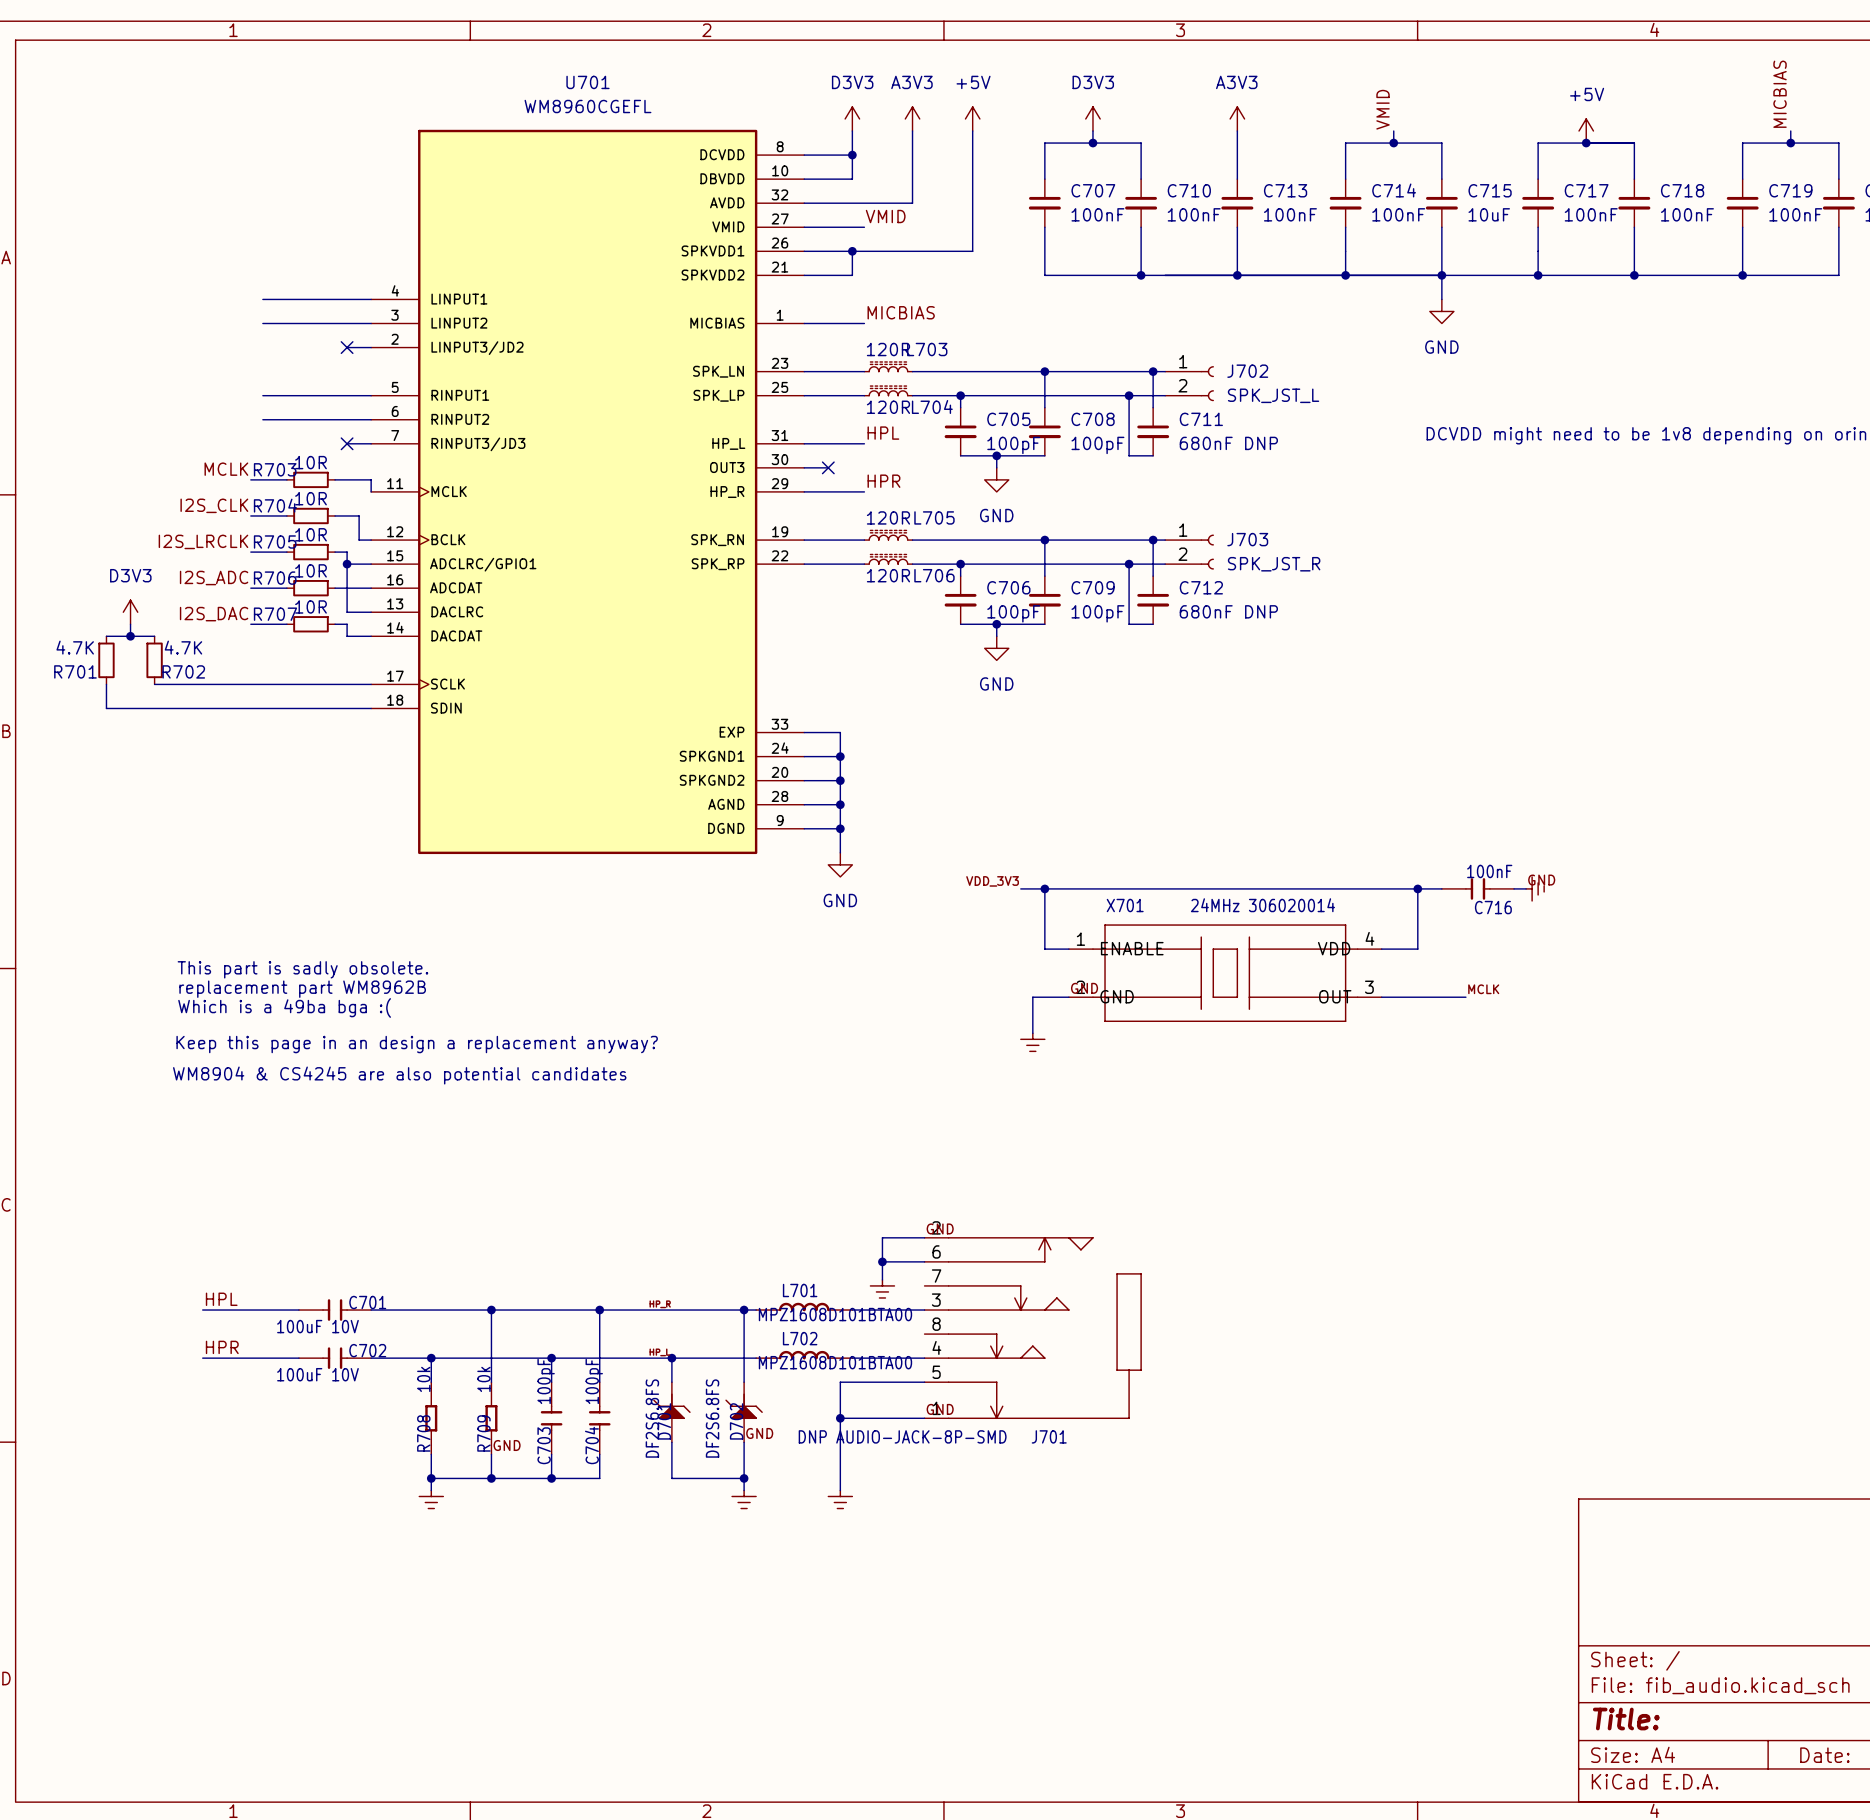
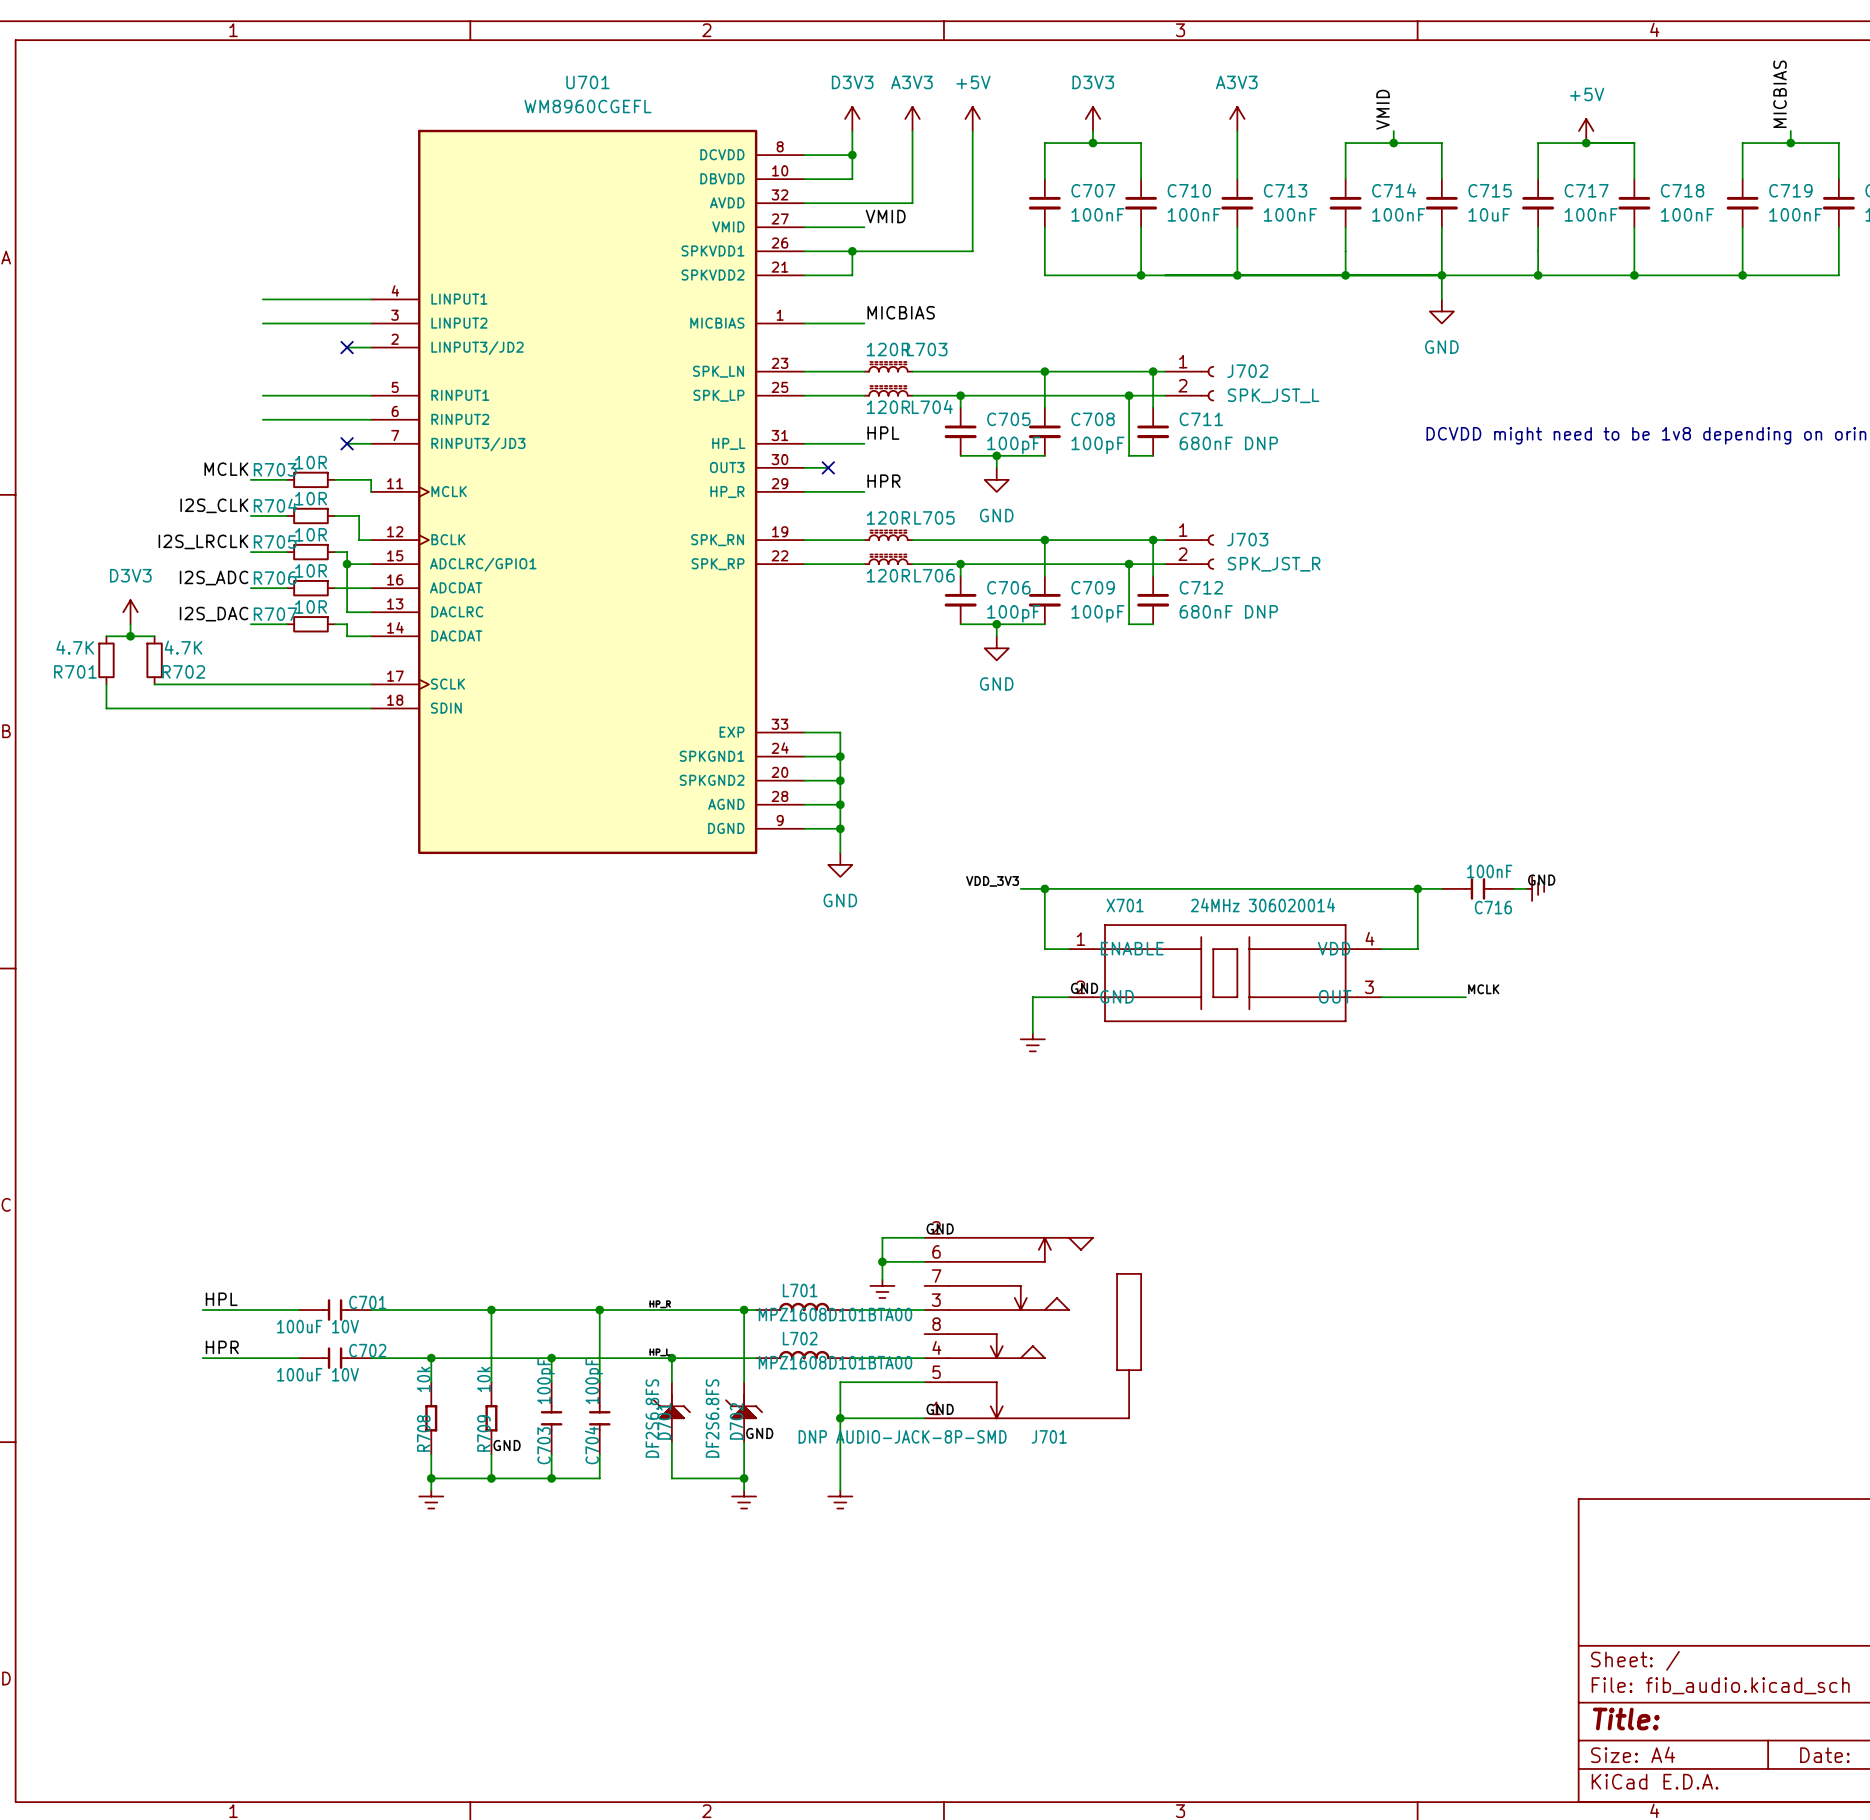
text: This part is sadly obsolete. (302, 969) -> none
text: replacement part WM8962B (302, 989) -> none
text: Which is a 49ba bga :( (284, 1007) -> none
text: Keep this page in an design a replacement anyway? (417, 1044) -> none
text: WM8904 & CS4245 are also potential candidates (399, 1075) -> none

